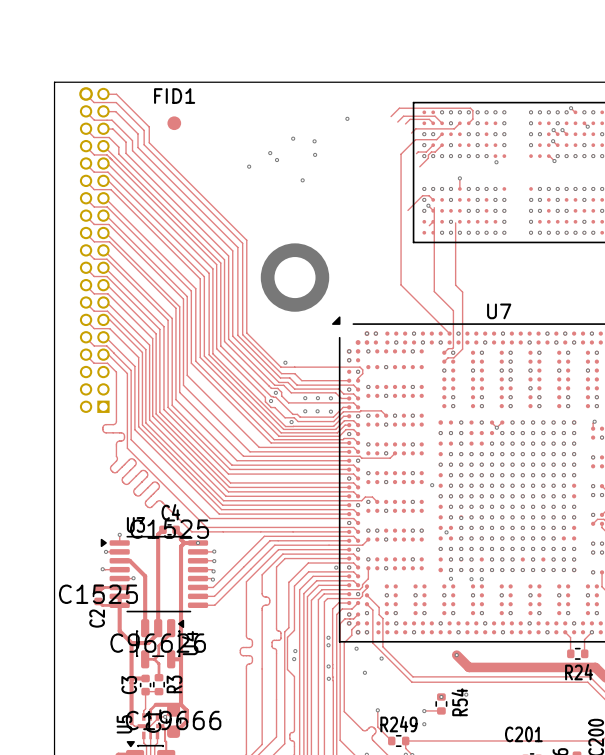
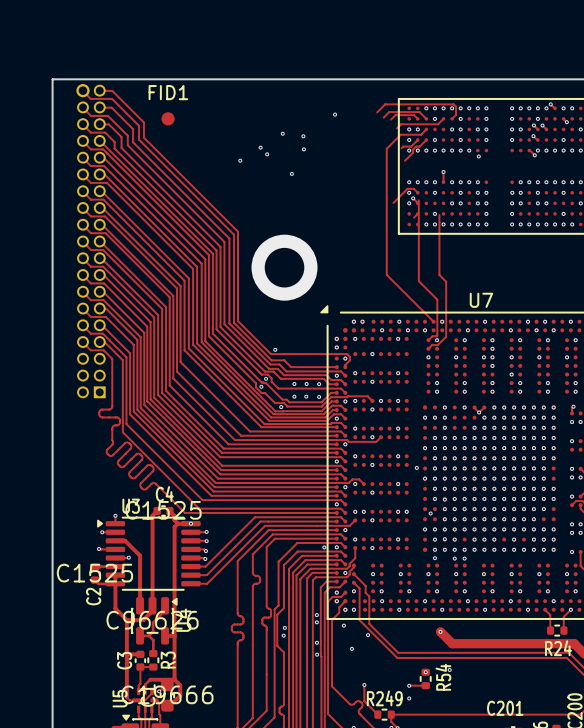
via: none -> (572, 422)

